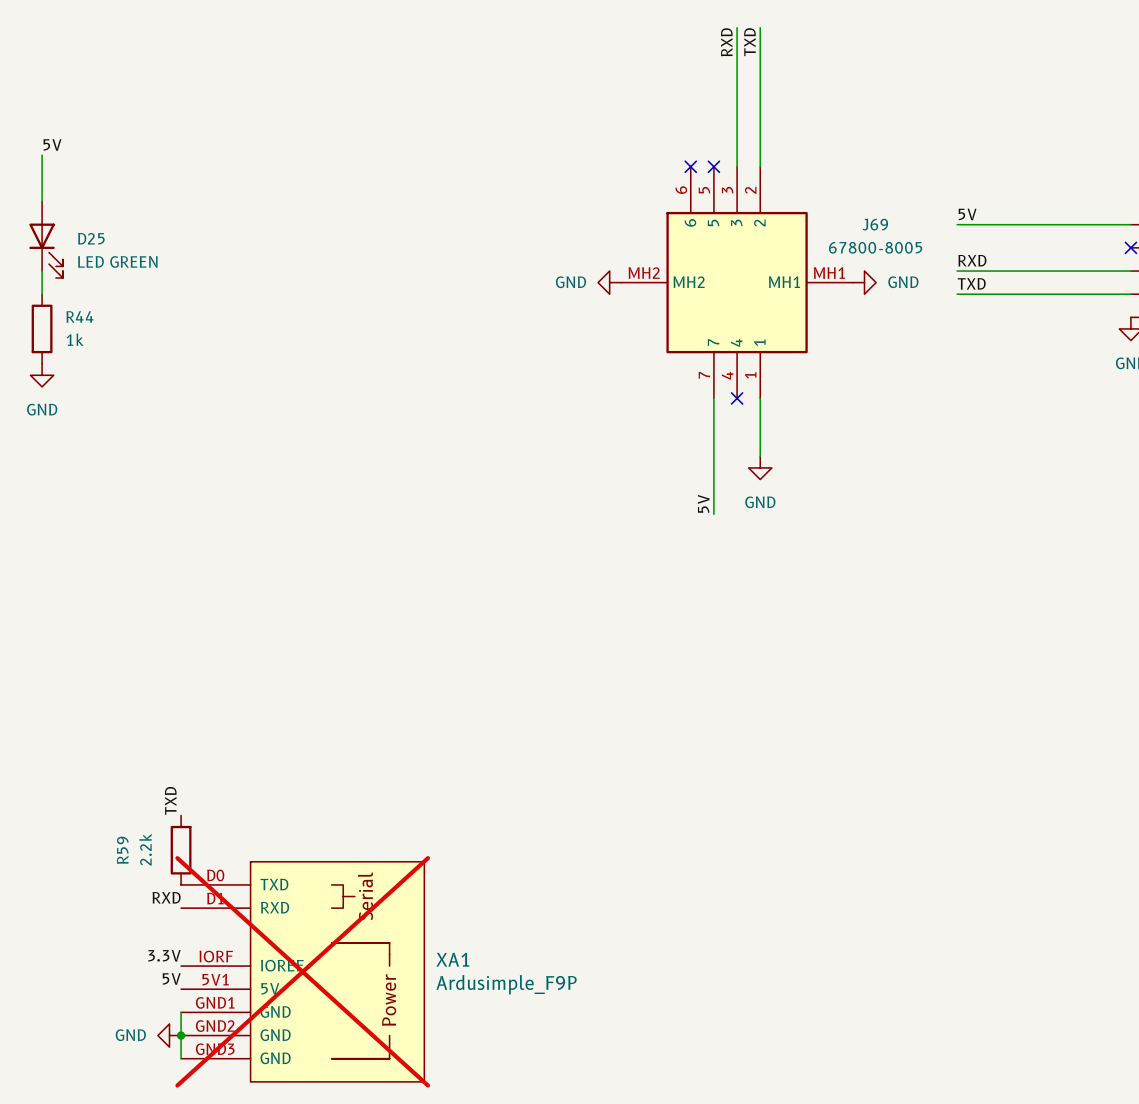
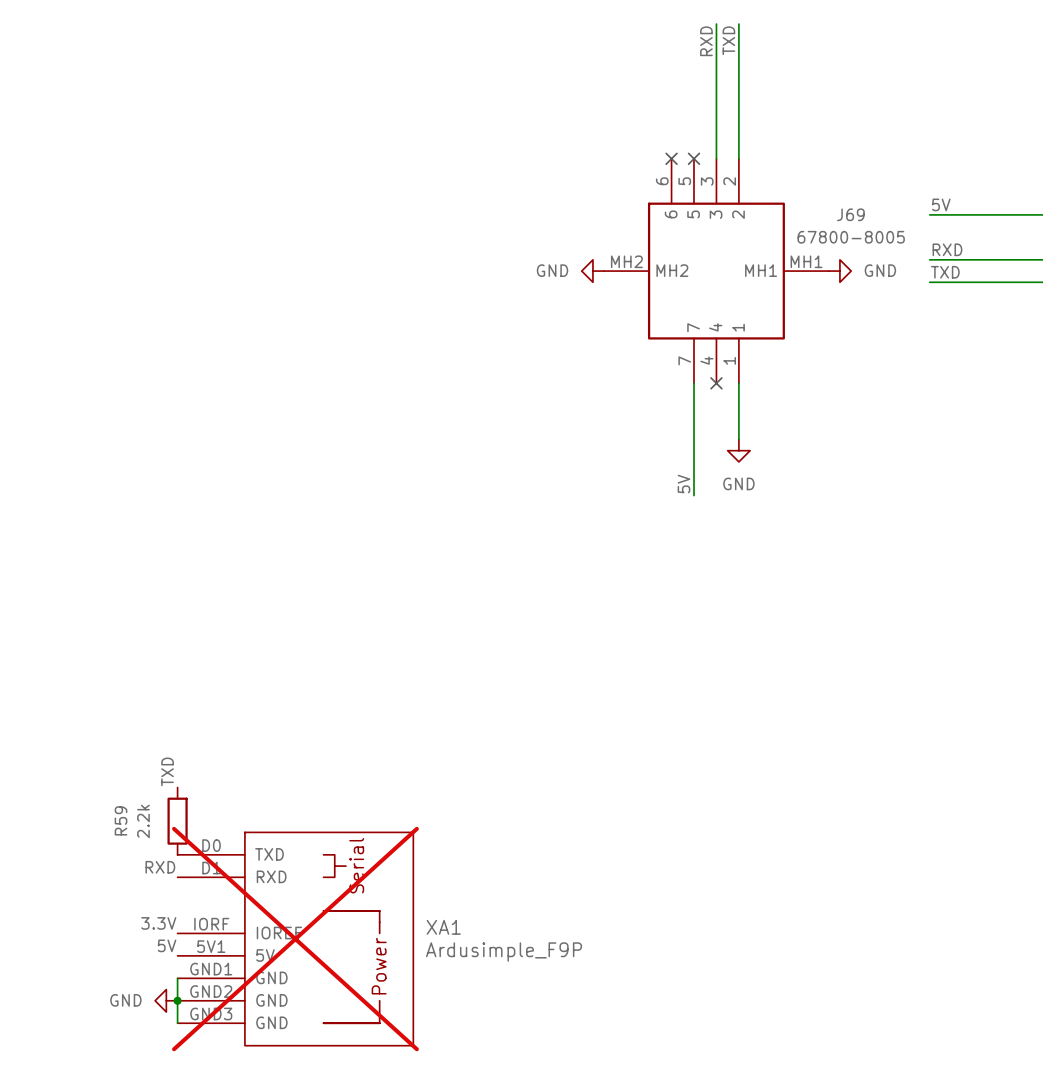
label: 5V (52, 144) -> none
wire: (42, 155) (42, 201) -> none
D25: LED GREEN (46, 239) -> none
wire: (42, 271) (42, 294) -> none
R44: 1k (42, 328) -> none
power symbol: GND (42, 375) -> none

